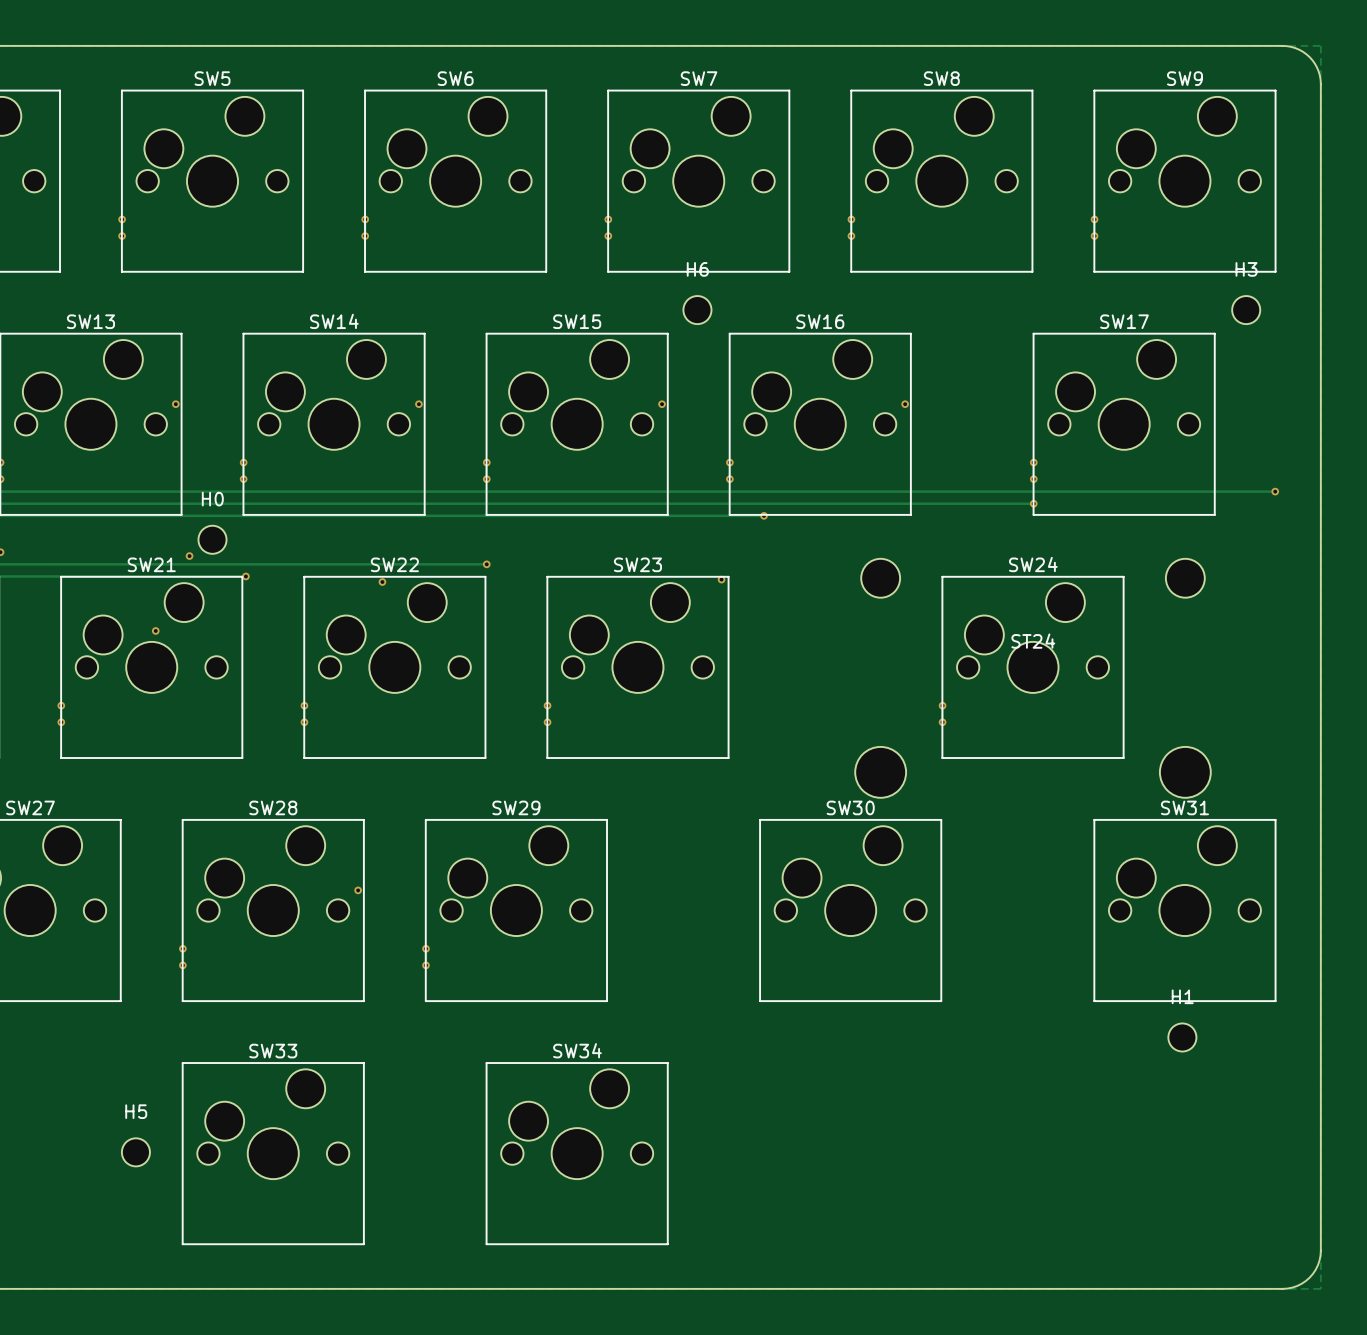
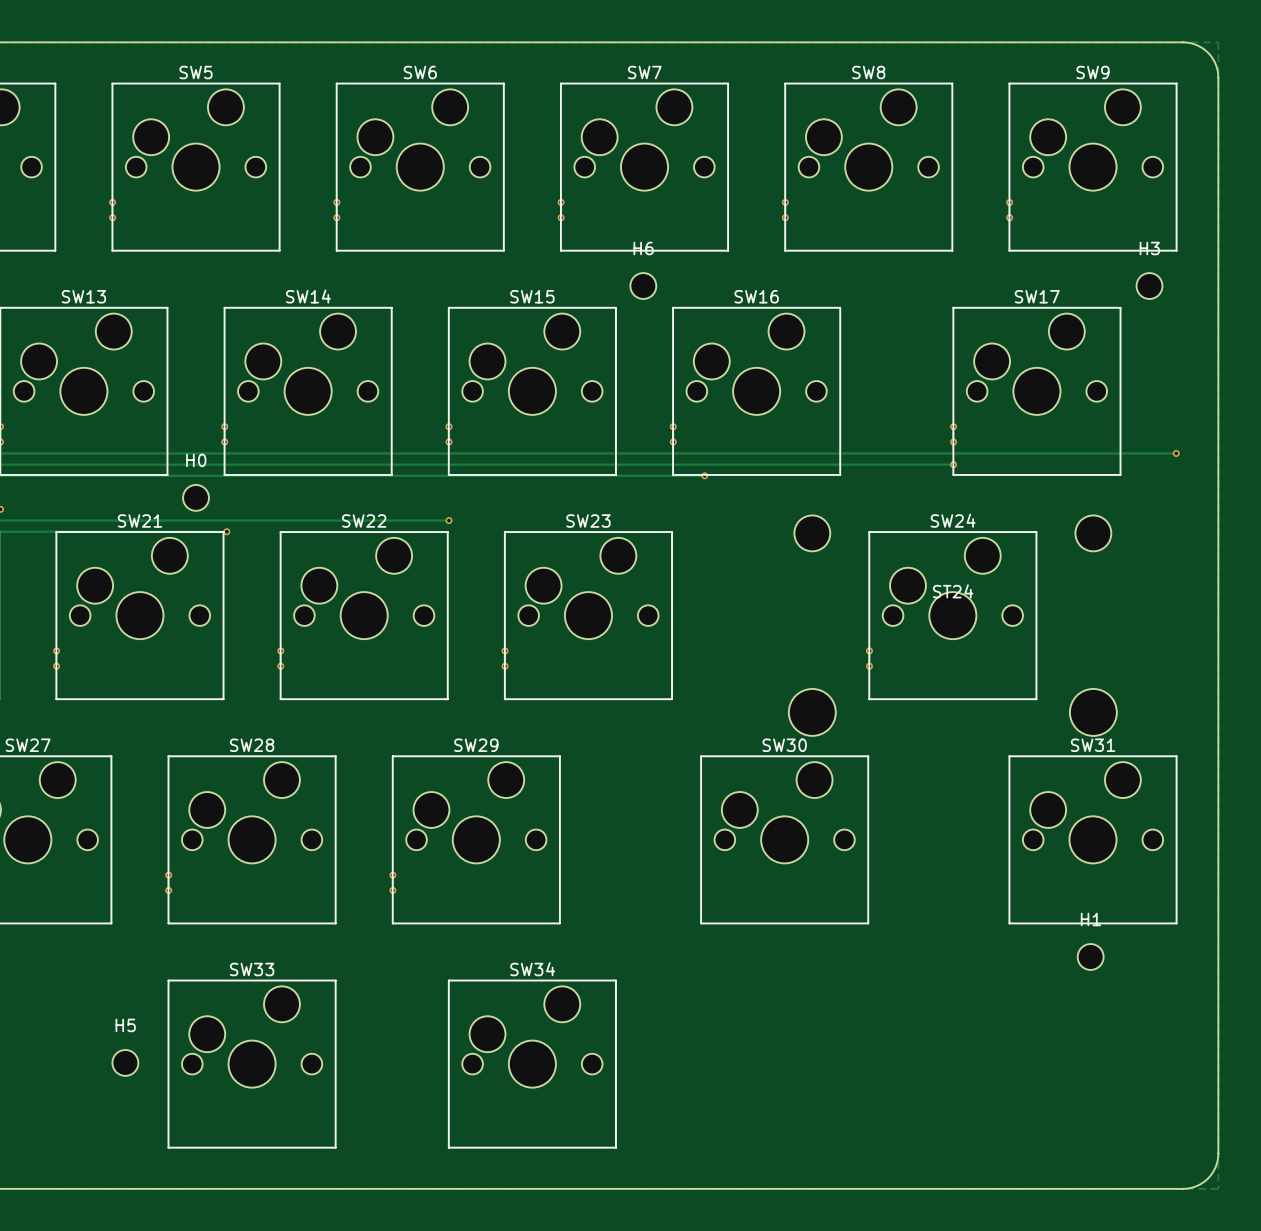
via: (175, 404) -> none
via: (418, 404) -> none
via: (662, 404) -> none
via: (905, 404) -> none
via: (189, 556) -> none
via: (721, 579) -> none
via: (382, 582) -> none
via: (155, 630) -> none
via: (358, 890) -> none

